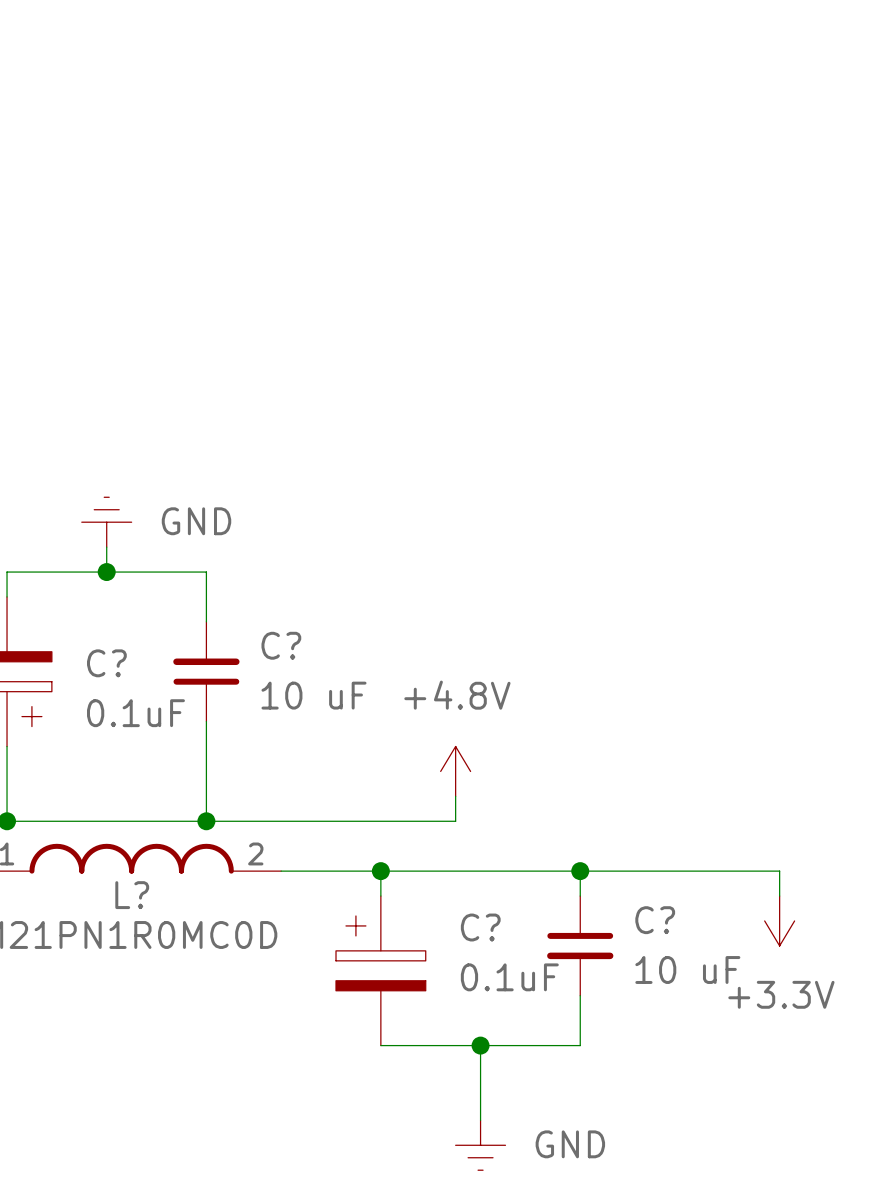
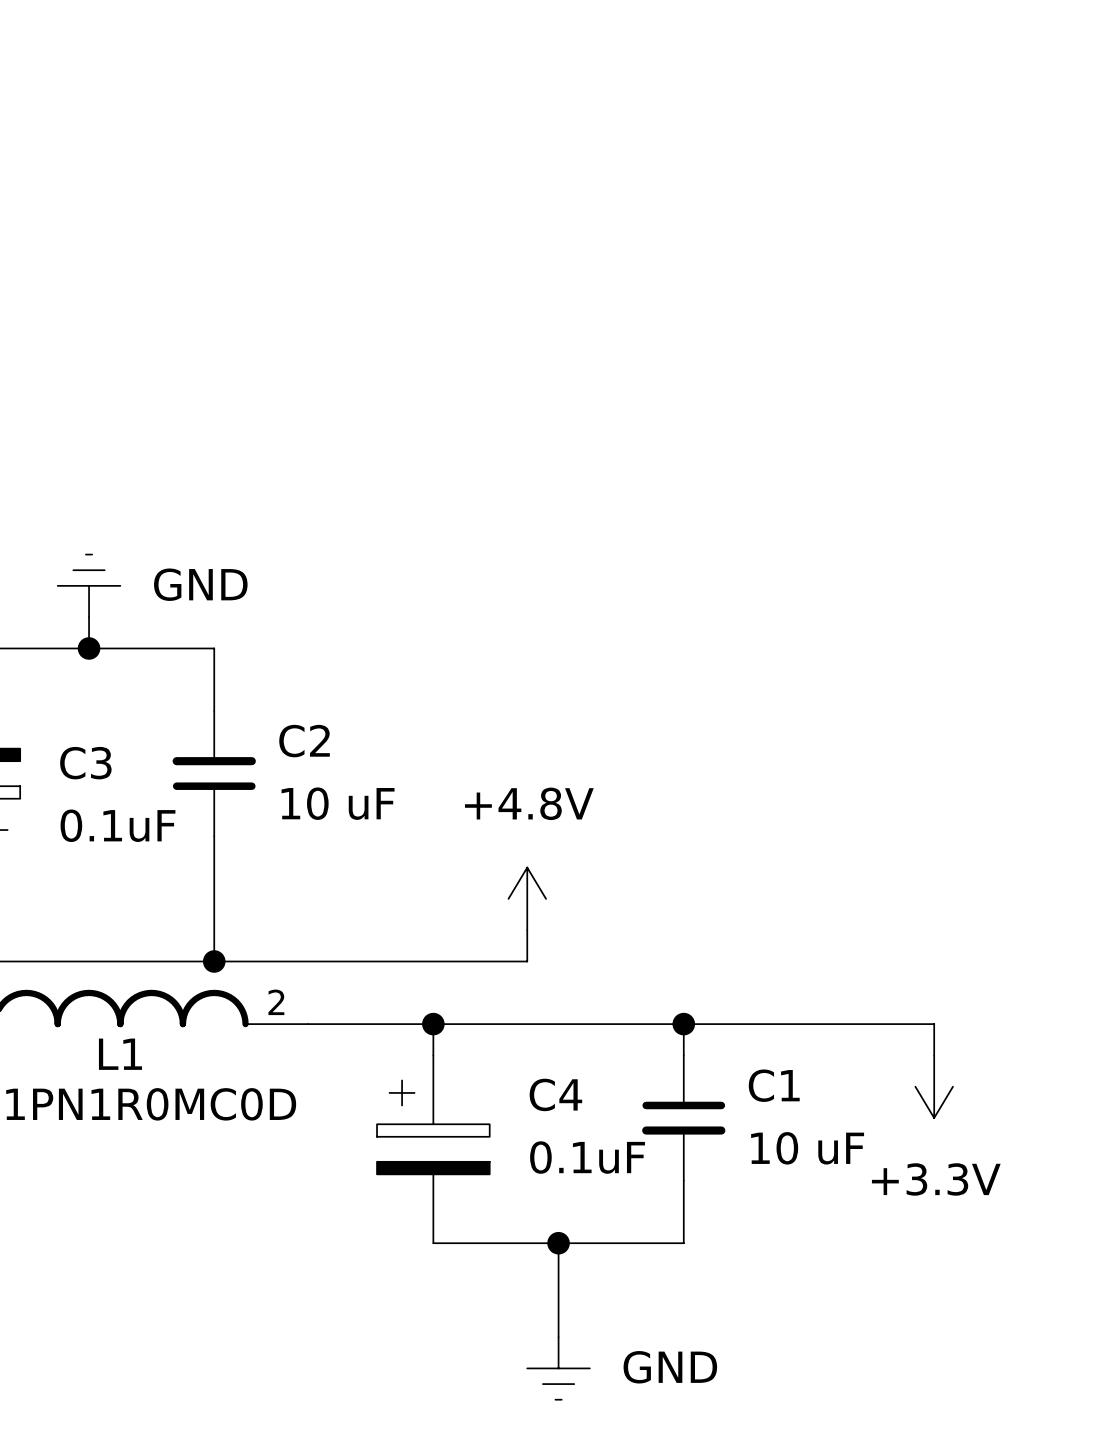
C? name: C? (281, 645) -> C2 (304, 741)
C? name: C? (106, 663) -> C3 (85, 763)
L? name: L? (132, 895) -> L1 (120, 1054)
C? name: C? (655, 920) -> C1 (774, 1085)
C? name: C? (480, 927) -> C4 (555, 1094)

